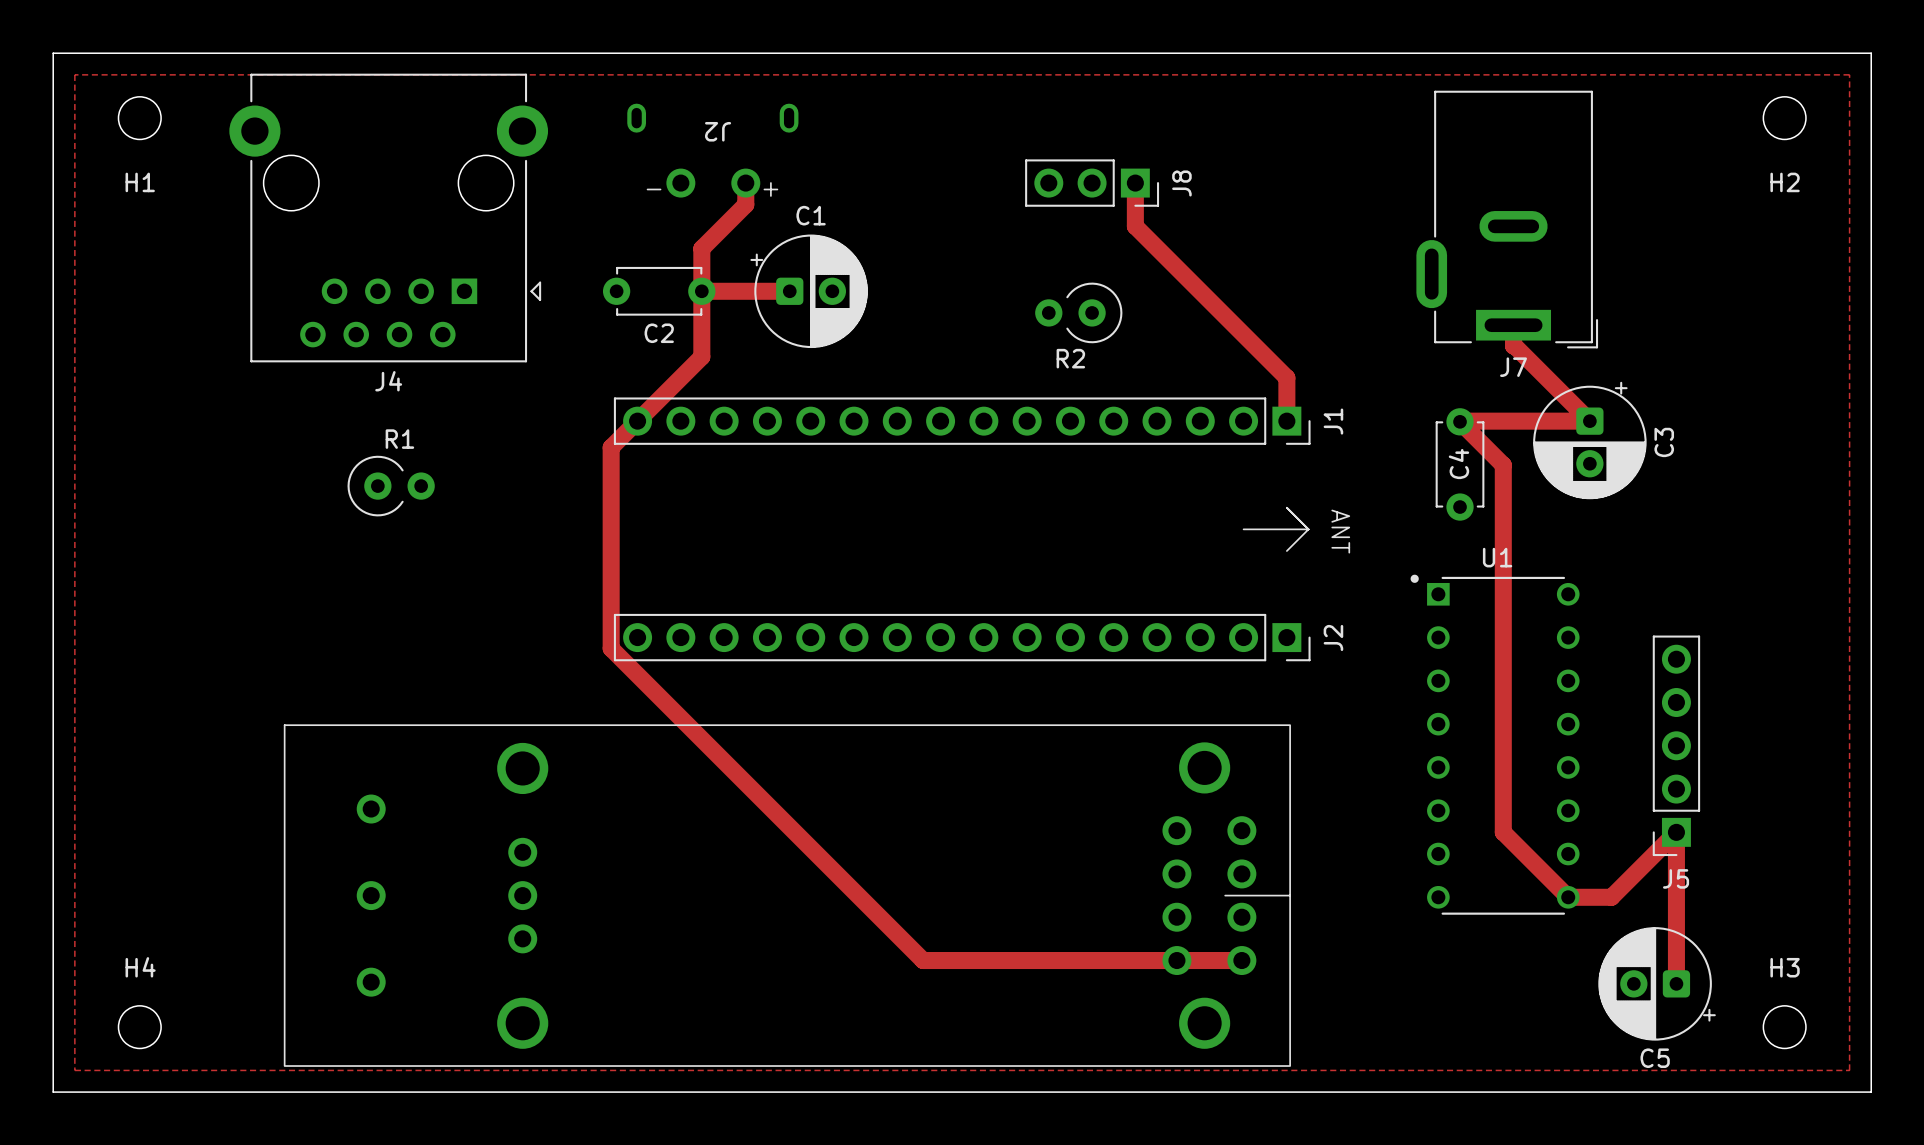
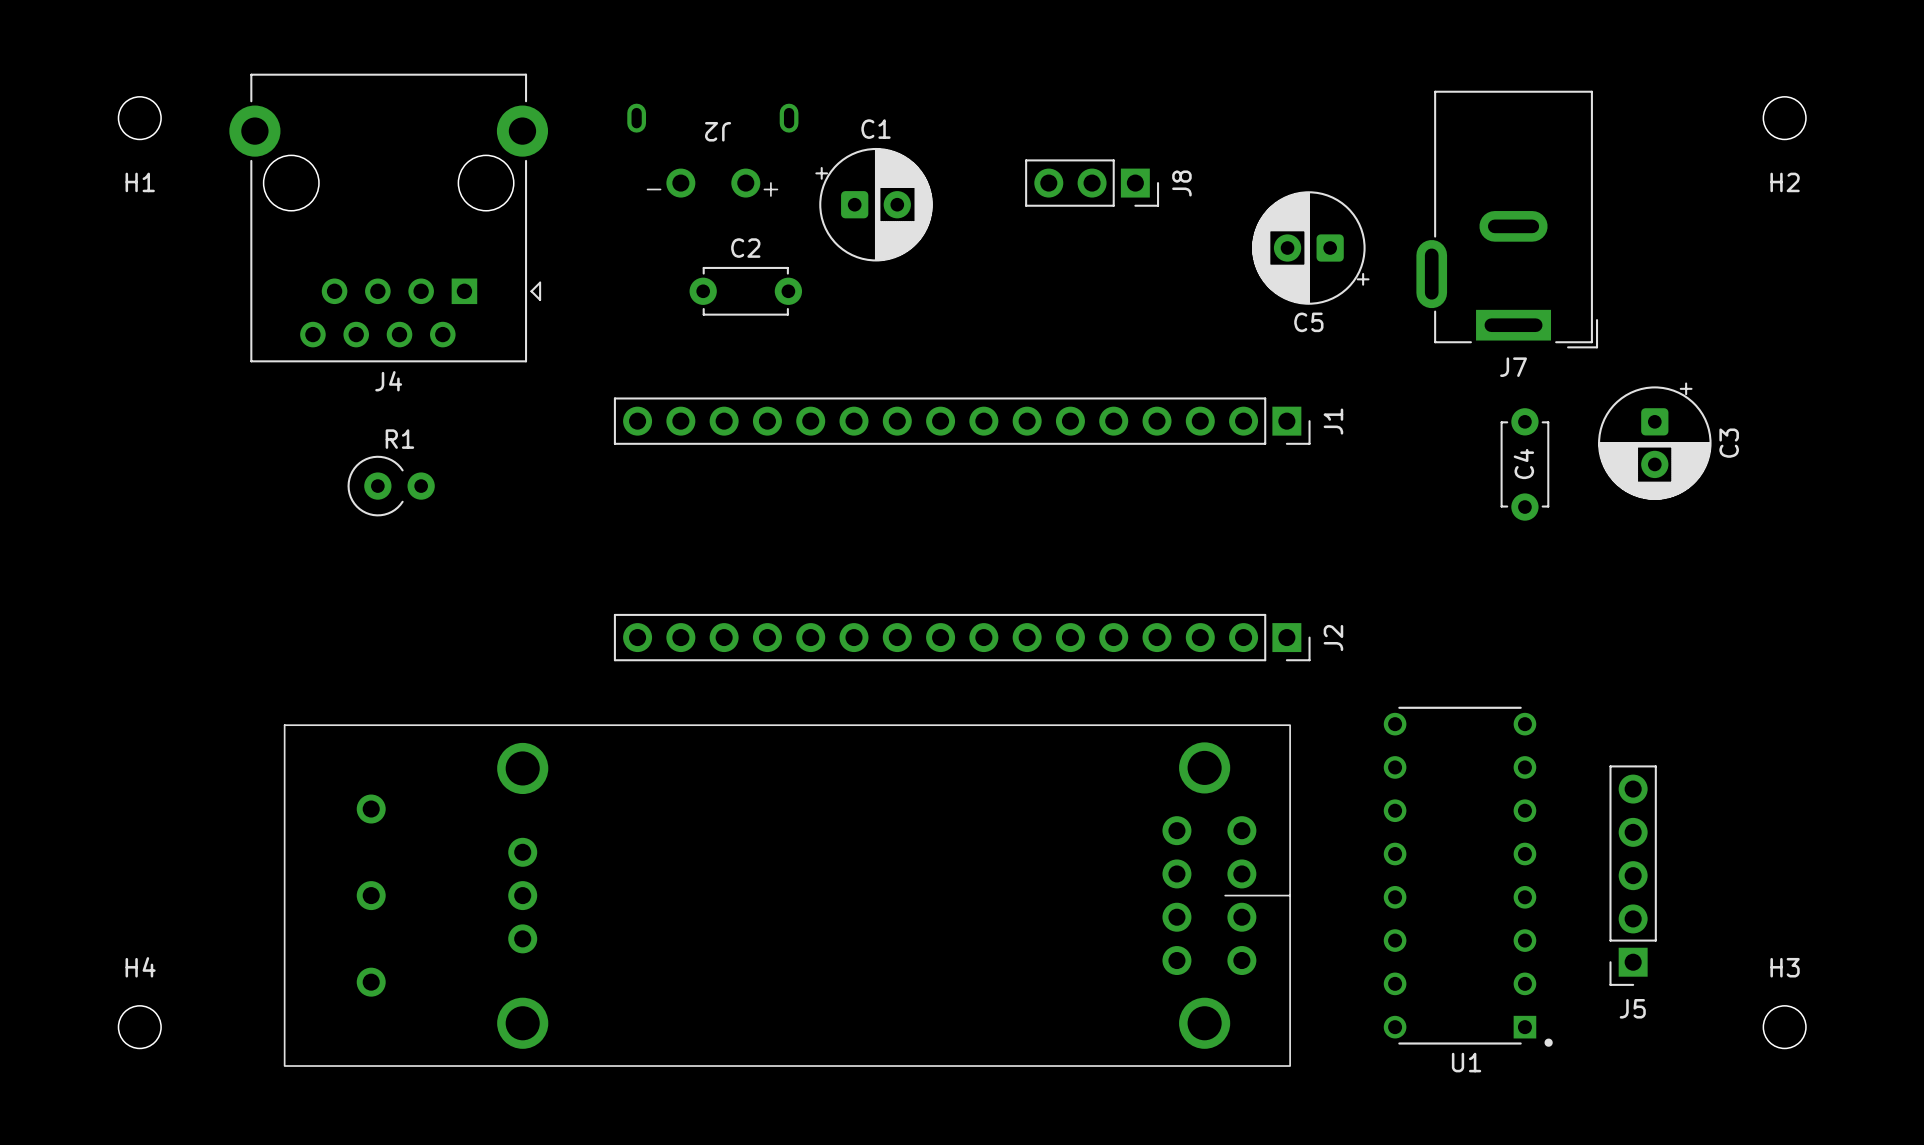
board edge: (53, 53) (1871, 53) (1871, 1092) (53, 1092) (53, 53) -> none
zone outline: (74, 74) (74, 1070) (1849, 1070) (1849, 74) (74, 74) -> none
track: (745, 183) (745, 204) (701, 248) (701, 356) (611, 447) (611, 648) (923, 960) (1241, 960) -> none
track: (1135, 183) (1135, 226) (1286, 377) (1286, 421) -> none
C2 position: (659, 291) -> (745, 291)
track: (701, 291) (789, 291) -> none
C1 position: (809, 291) -> (874, 204)
R2: (1078, 312) -> none
track: (1513, 325) (1513, 345) (1589, 421) (1460, 421) (1503, 465) (1503, 832) (1568, 897) (1611, 897) (1676, 832) (1676, 983) -> none
C2 name position: C2 (659, 333) -> C2 (745, 248)
C3 position: (1589, 440) -> (1654, 441)
C4 position: (1460, 464) -> (1524, 464)
line: (1286, 507) (1308, 529) -> none
line: (1243, 529) (1308, 529) -> none
line: (1308, 529) (1286, 551) -> none
text: ANT (1340, 531) -> none
U1 rotation: 0° (1495, 744) -> 180° (1468, 876)
J5 position: (1676, 745) -> (1633, 875)
C5 position: (1657, 983) -> (1310, 248)

